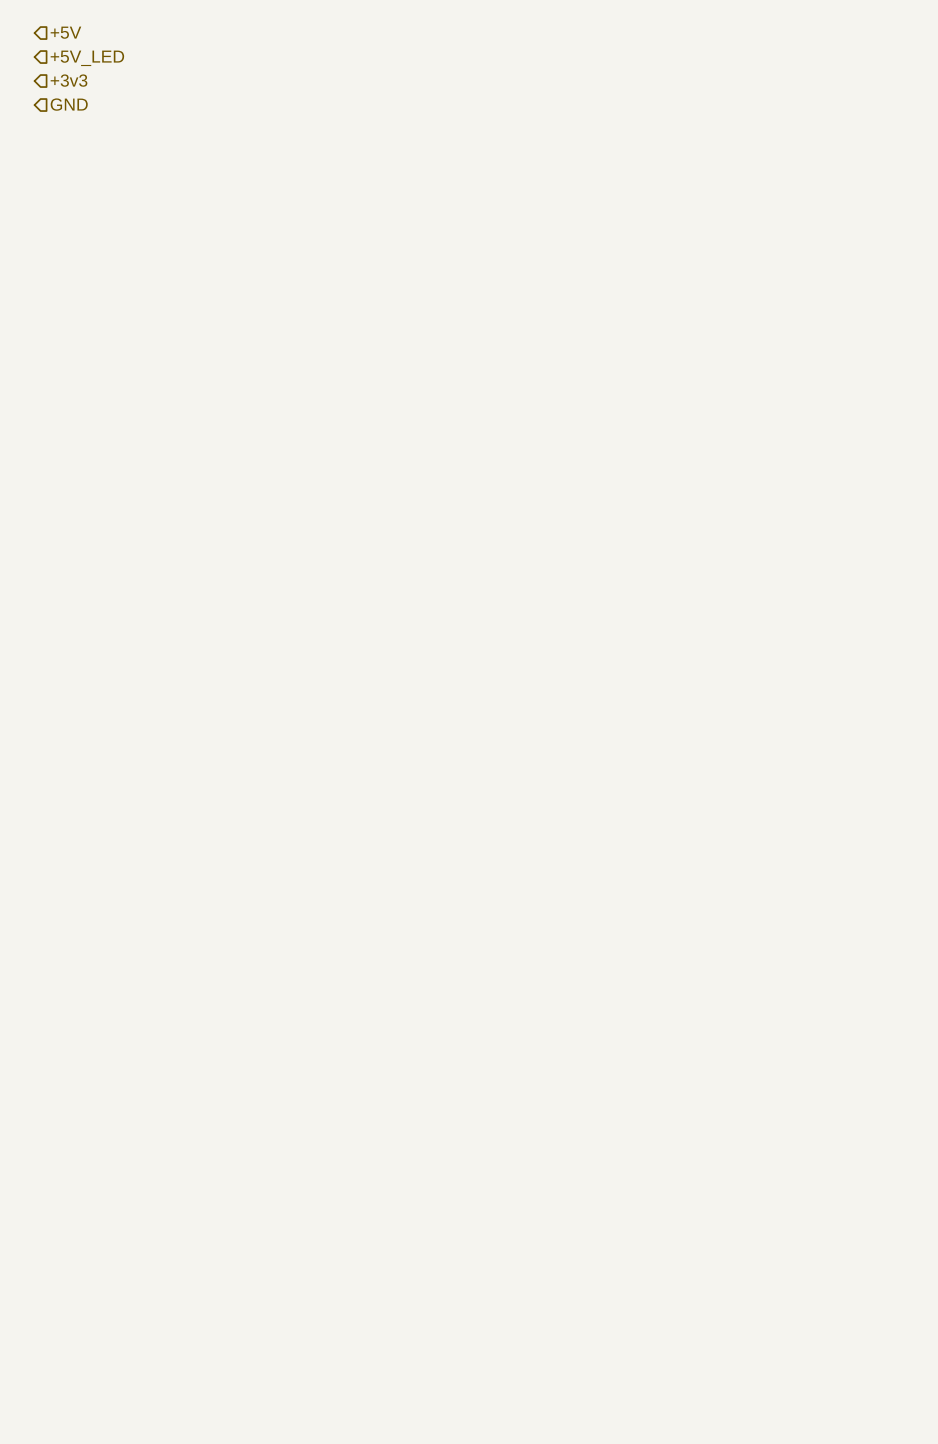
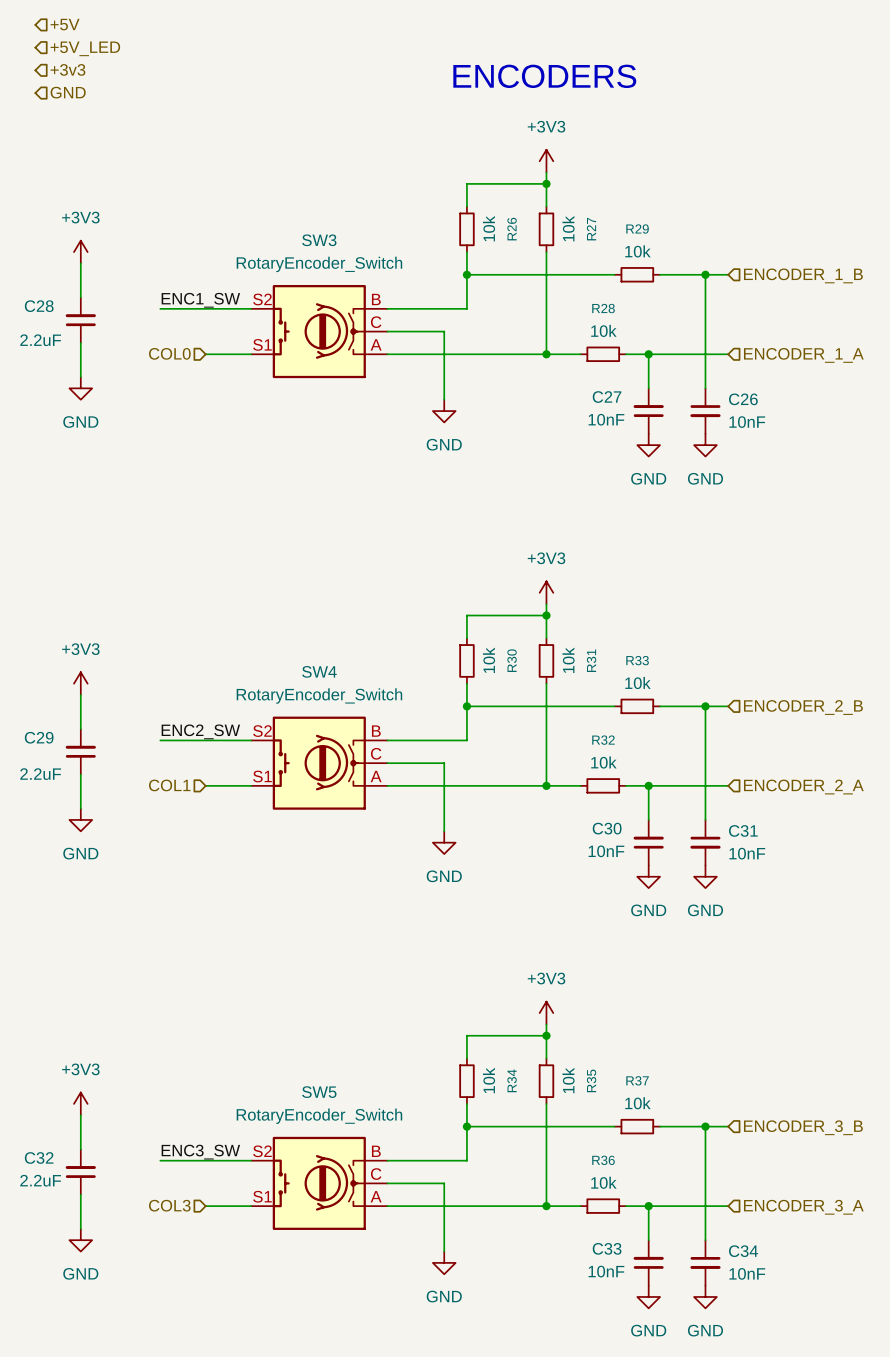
text: none -> ENCODERS (544, 76)
power symbol: none -> +3V3 (546, 161)
wire: none -> (546, 172) (546, 206)
wire: none -> (546, 183) (466, 183) (466, 206)
junction: none -> (546, 183)
R26: none -> 10k (466, 229)
R27: none -> 10k (546, 229)
power symbol: none -> +3V3 (80, 252)
wire: none -> (466, 252) (466, 308) (387, 308)
wire: none -> (546, 252) (546, 354)
wire: none -> (80, 263) (80, 297)
wire: none -> (466, 274) (614, 274)
junction: none -> (466, 274)
R29: none -> 10k (637, 274)
wire: none -> (660, 274) (728, 274)
wire: none -> (705, 274) (705, 388)
junction: none -> (705, 274)
hierarchical label: none -> ENCODER_1_B (803, 275)
label: none -> ENC1_SW (200, 300)
wire: none -> (160, 308) (251, 308)
C28: none -> 2.2uF (80, 320)
SW3: none -> RotaryEncoder_Switch (319, 331)
wire: none -> (387, 331) (444, 331) (444, 399)
wire: none -> (80, 342) (80, 377)
hierarchical label: none -> COL0 (169, 353)
wire: none -> (205, 354) (251, 354)
wire: none -> (387, 354) (580, 354)
junction: none -> (546, 354)
R28: none -> 10k (603, 354)
wire: none -> (625, 354) (728, 354)
wire: none -> (648, 354) (648, 388)
junction: none -> (648, 354)
hierarchical label: none -> ENCODER_1_A (803, 355)
power symbol: none -> GND (80, 388)
power symbol: none -> GND (444, 411)
C27: none -> 10nF (648, 411)
C26: none -> 10nF (705, 411)
power symbol: none -> GND (648, 445)
power symbol: none -> GND (705, 445)
power symbol: none -> +3V3 (546, 592)
wire: none -> (546, 604) (546, 638)
wire: none -> (546, 615) (466, 615) (466, 638)
junction: none -> (546, 615)
R30: none -> 10k (466, 660)
R31: none -> 10k (546, 660)
power symbol: none -> +3V3 (80, 683)
wire: none -> (466, 683) (466, 740) (387, 740)
wire: none -> (546, 683) (546, 785)
wire: none -> (80, 695) (80, 729)
wire: none -> (466, 706) (614, 706)
junction: none -> (466, 706)
R33: none -> 10k (637, 706)
wire: none -> (660, 706) (728, 706)
wire: none -> (705, 706) (705, 819)
junction: none -> (705, 706)
hierarchical label: none -> ENCODER_2_B (803, 707)
label: none -> ENC2_SW (200, 731)
wire: none -> (160, 740) (251, 740)
C29: none -> 2.2uF (80, 751)
SW4: none -> RotaryEncoder_Switch (319, 763)
wire: none -> (387, 763) (444, 763) (444, 831)
wire: none -> (80, 774) (80, 808)
hierarchical label: none -> COL1 (169, 785)
wire: none -> (205, 785) (251, 785)
wire: none -> (387, 785) (580, 785)
junction: none -> (546, 785)
R32: none -> 10k (603, 785)
wire: none -> (625, 785) (728, 785)
wire: none -> (648, 785) (648, 819)
junction: none -> (648, 785)
hierarchical label: none -> ENCODER_2_A (803, 787)
power symbol: none -> GND (80, 819)
power symbol: none -> GND (444, 842)
C30: none -> 10nF (648, 842)
C31: none -> 10nF (705, 842)
power symbol: none -> GND (648, 876)
power symbol: none -> GND (705, 876)
power symbol: none -> +3V3 (546, 1013)
wire: none -> (546, 1024) (546, 1058)
wire: none -> (546, 1035) (466, 1035) (466, 1058)
junction: none -> (546, 1035)
R34: none -> 10k (466, 1081)
R35: none -> 10k (546, 1081)
power symbol: none -> +3V3 (80, 1103)
wire: none -> (466, 1103) (466, 1160) (387, 1160)
wire: none -> (546, 1103) (546, 1206)
wire: none -> (80, 1115) (80, 1149)
wire: none -> (466, 1126) (614, 1126)
junction: none -> (466, 1126)
R37: none -> 10k (637, 1126)
wire: none -> (660, 1126) (728, 1126)
wire: none -> (705, 1126) (705, 1240)
junction: none -> (705, 1126)
hierarchical label: none -> ENCODER_3_B (803, 1127)
label: none -> ENC3_SW (200, 1152)
wire: none -> (160, 1160) (251, 1160)
C32: none -> 2.2uF (80, 1172)
SW5: none -> RotaryEncoder_Switch (319, 1183)
wire: none -> (387, 1183) (444, 1183) (444, 1251)
wire: none -> (80, 1194) (80, 1228)
hierarchical label: none -> COL3 (169, 1205)
wire: none -> (205, 1206) (251, 1206)
wire: none -> (387, 1206) (580, 1206)
junction: none -> (546, 1206)
R36: none -> 10k (603, 1206)
wire: none -> (625, 1206) (728, 1206)
wire: none -> (648, 1206) (648, 1240)
junction: none -> (648, 1206)
hierarchical label: none -> ENCODER_3_A (803, 1207)
power symbol: none -> GND (80, 1240)
power symbol: none -> GND (444, 1262)
C33: none -> 10nF (648, 1262)
C34: none -> 10nF (705, 1262)
power symbol: none -> GND (648, 1296)
power symbol: none -> GND (705, 1296)

